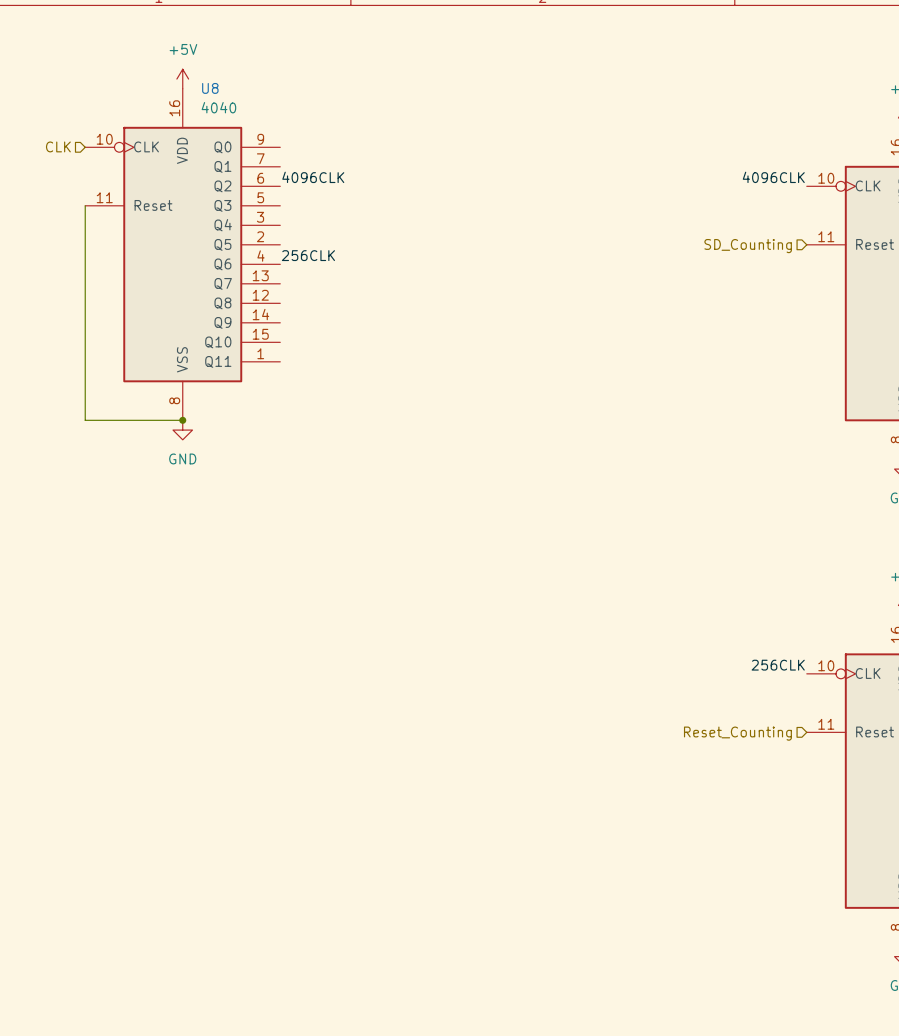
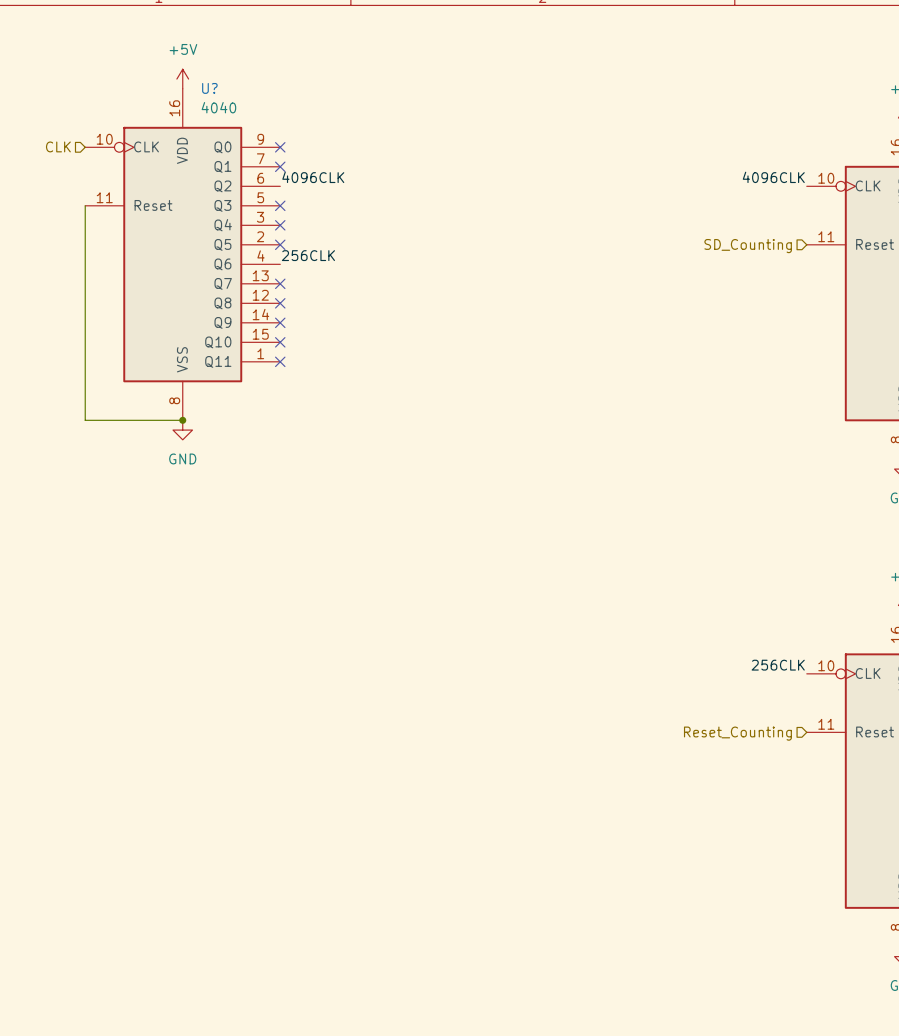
U8 name: U8 (210, 88) -> U? (209, 88)
no-connect mark: none -> (280, 147)
no-connect mark: none -> (280, 166)
no-connect mark: none -> (280, 205)
no-connect mark: none -> (280, 225)
no-connect mark: none -> (280, 244)
no-connect mark: none -> (280, 283)
no-connect mark: none -> (280, 303)
no-connect mark: none -> (280, 322)
no-connect mark: none -> (280, 342)
no-connect mark: none -> (280, 361)

